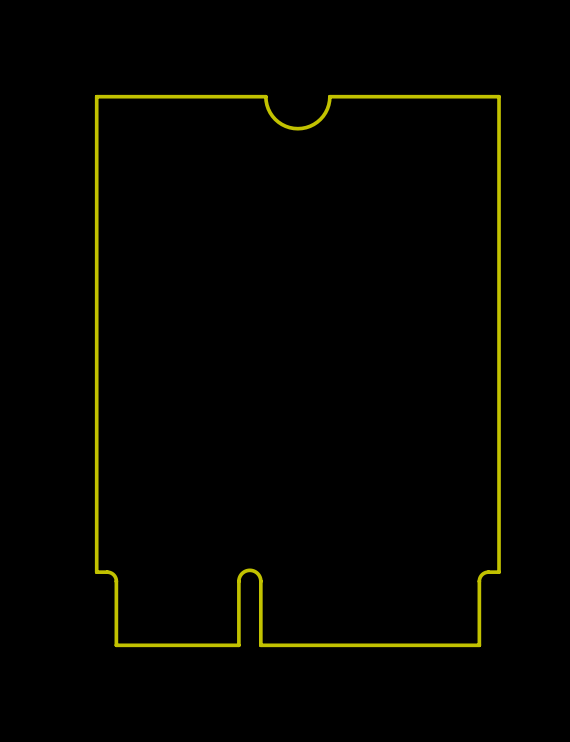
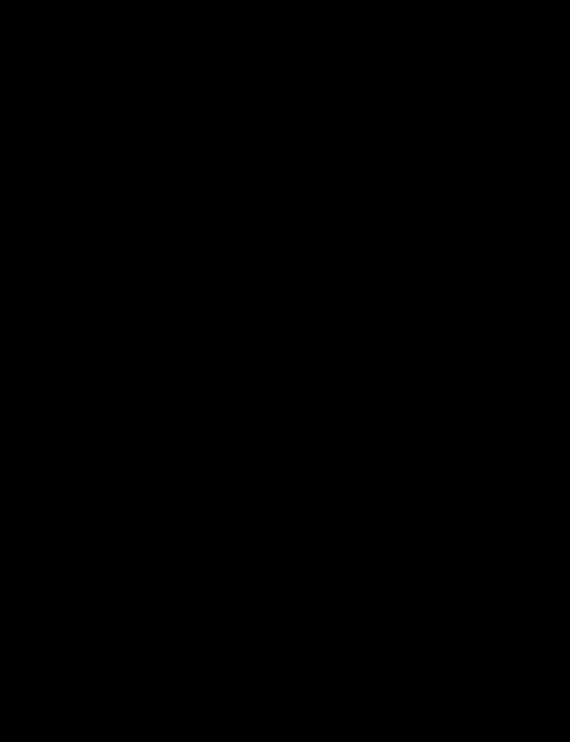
board edge: (499, 96) (499, 572) (485, 572) (479, 579) (479, 645) (260, 645) (260, 579) (257, 573) (249, 570) (242, 573) (238, 579) (238, 645) (116, 645) (116, 579) (110, 572) (96, 572) (96, 96) (265, 96) (268, 108) (275, 119) (285, 126) (297, 128) (310, 126) (320, 119) (327, 108) (329, 96) (499, 96) -> none

